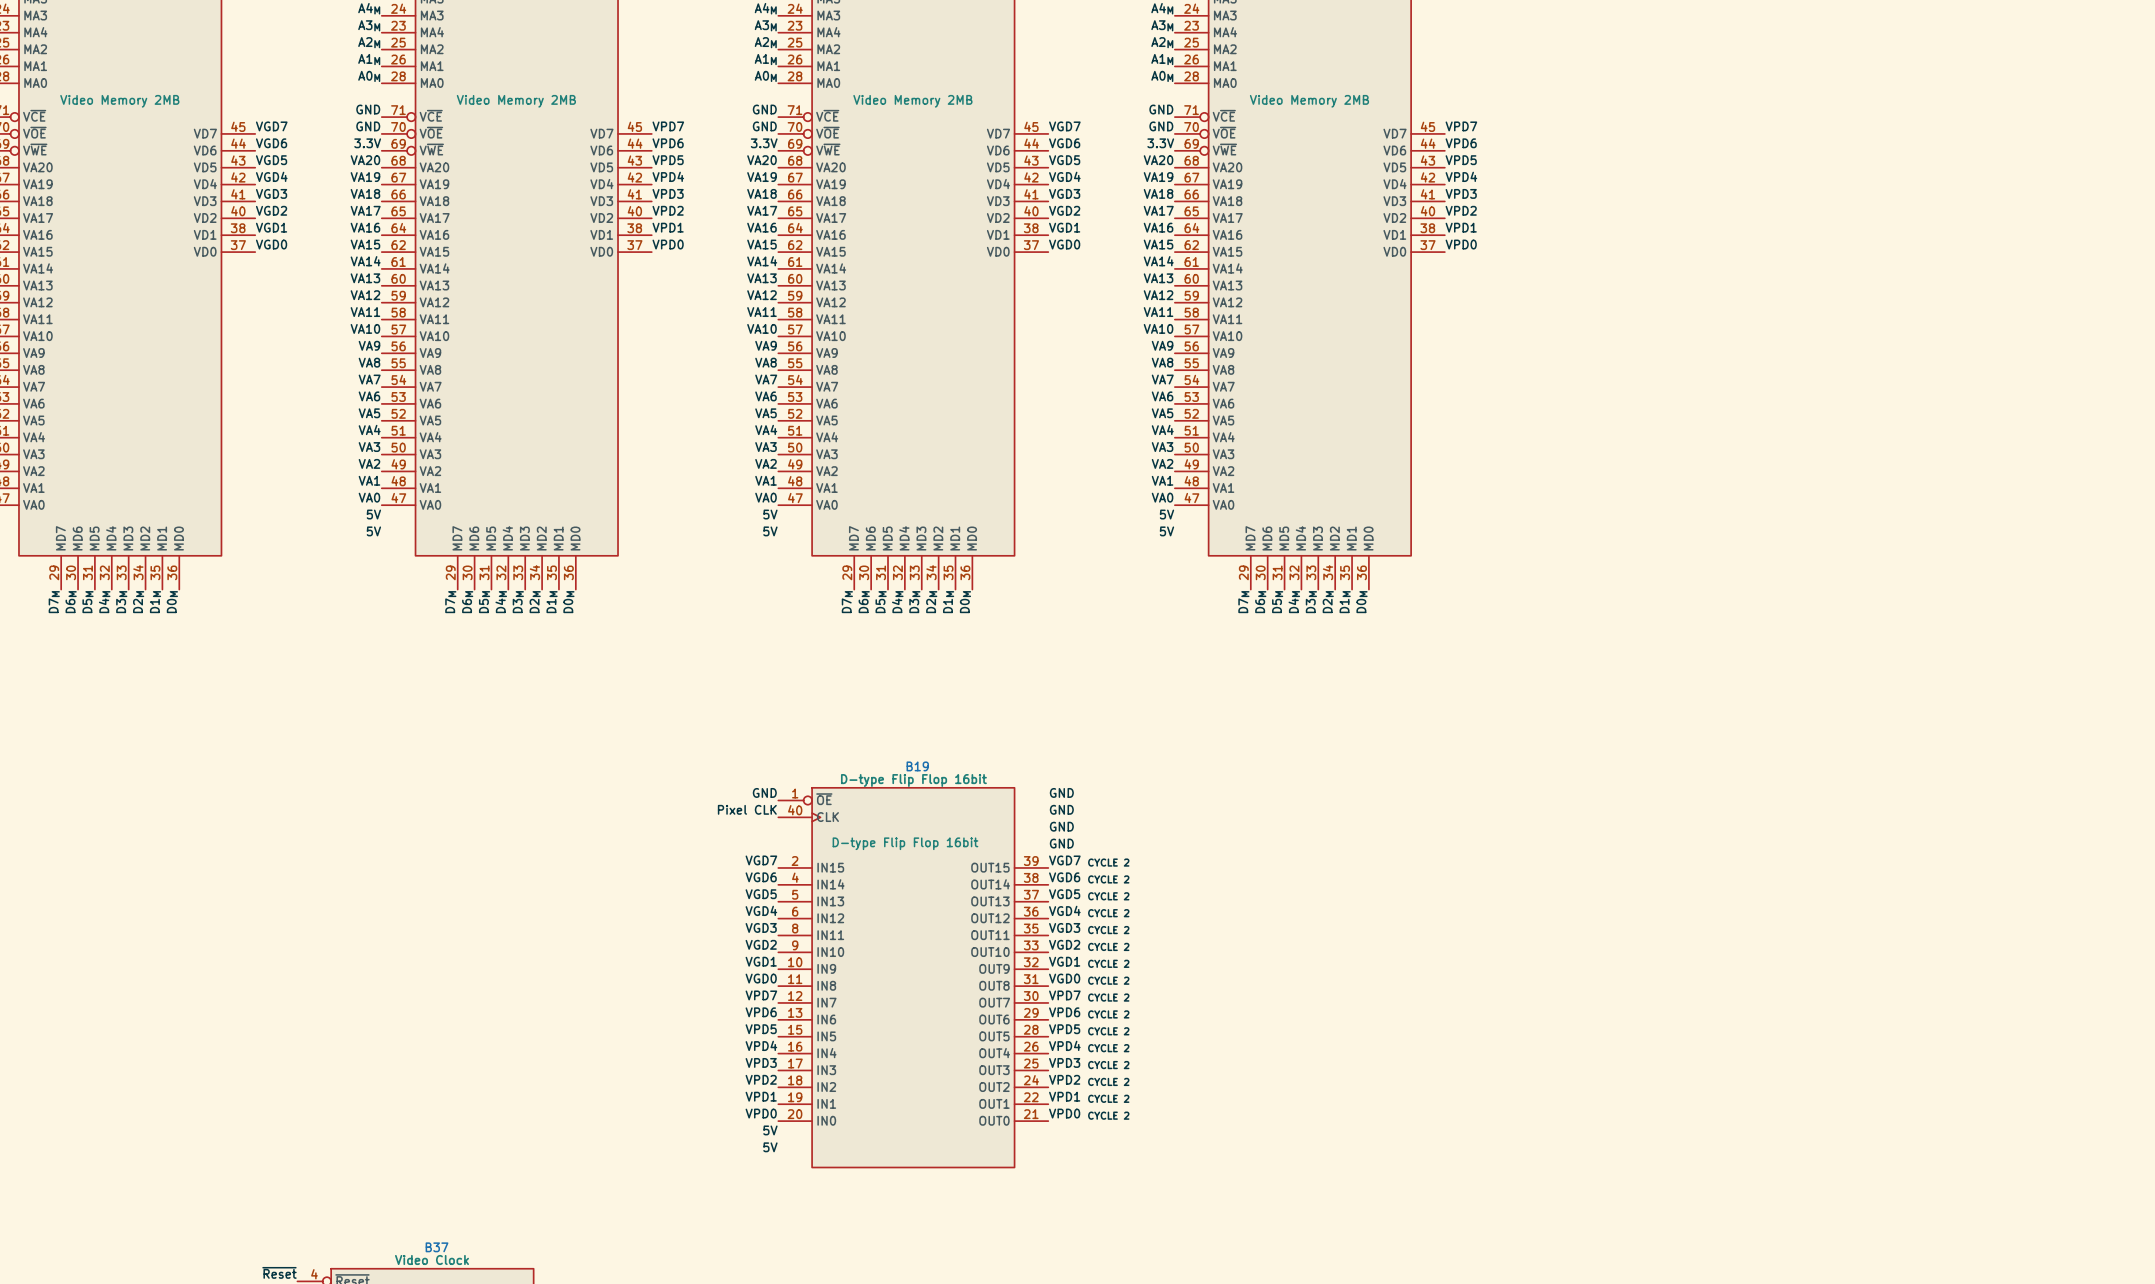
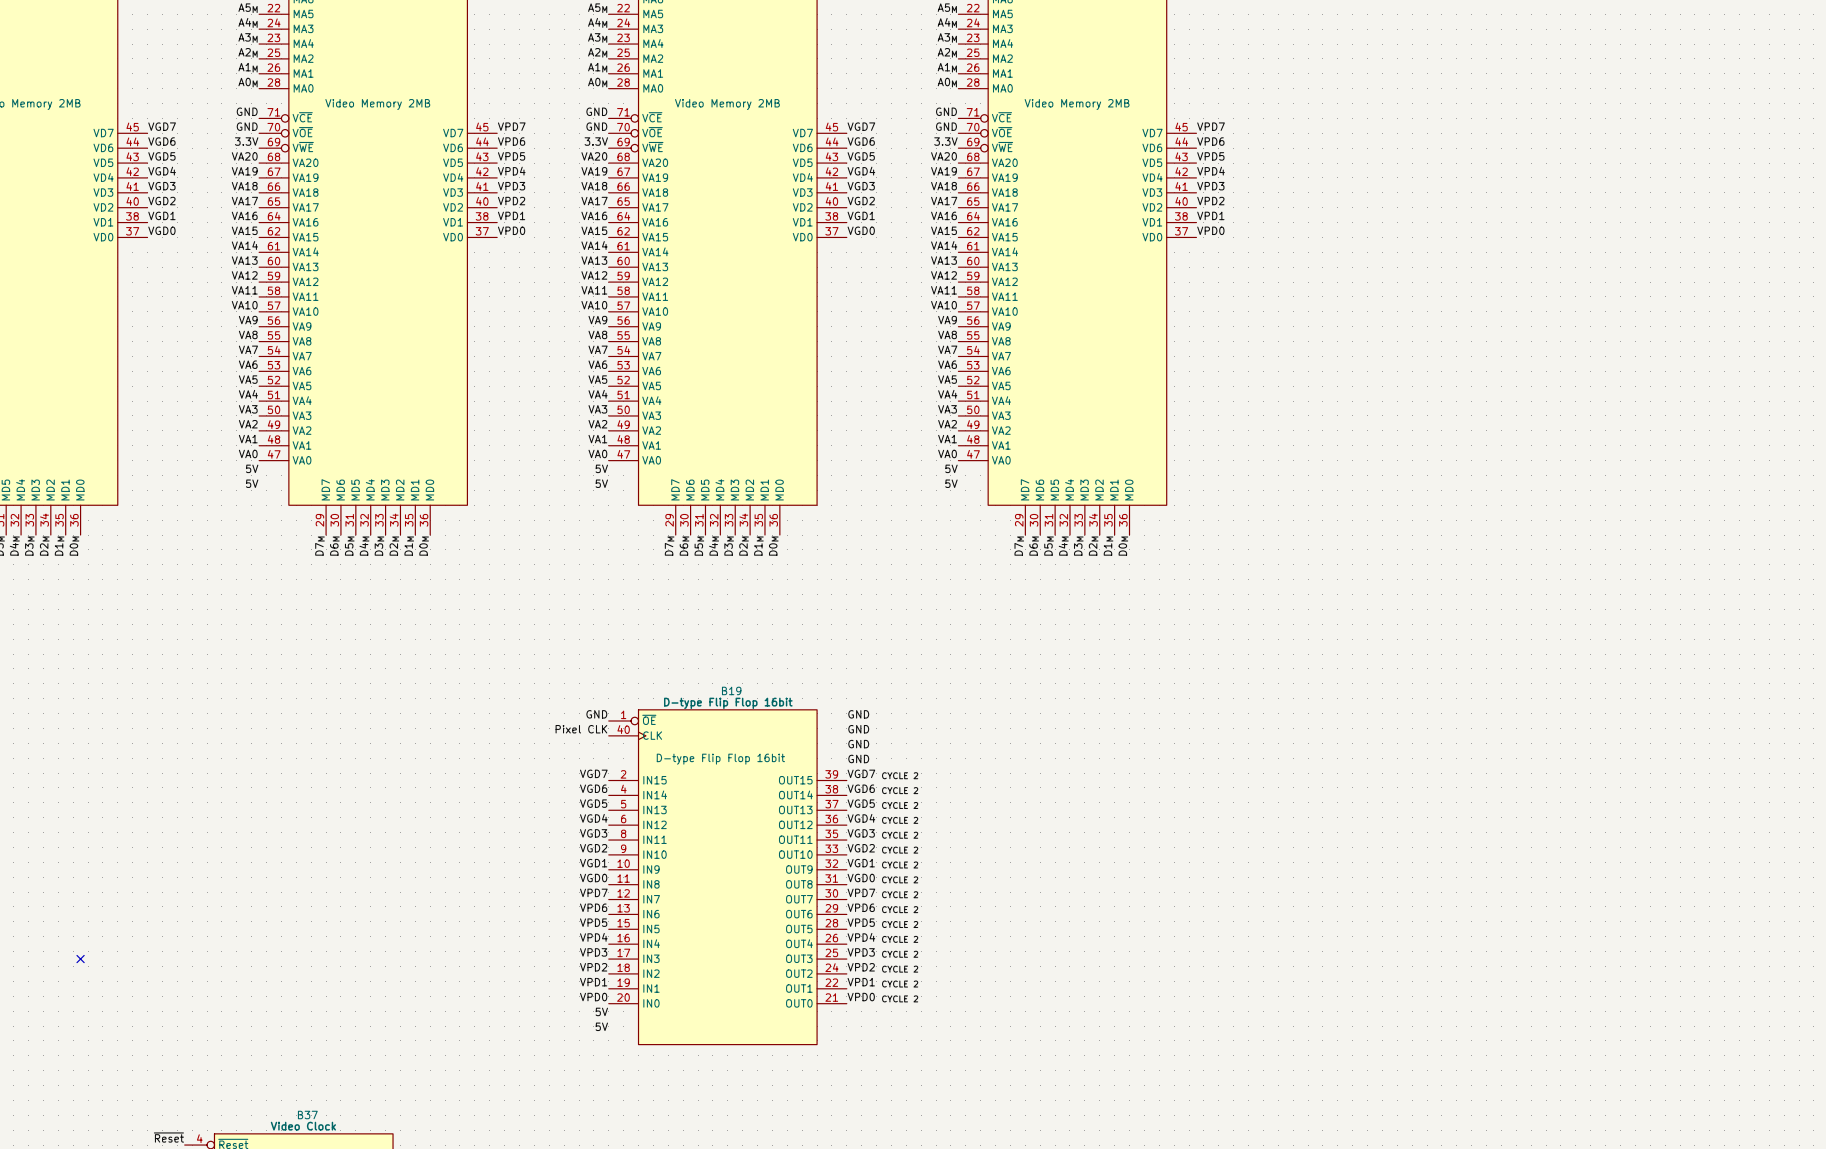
no-connect mark: none -> (80, 959)

